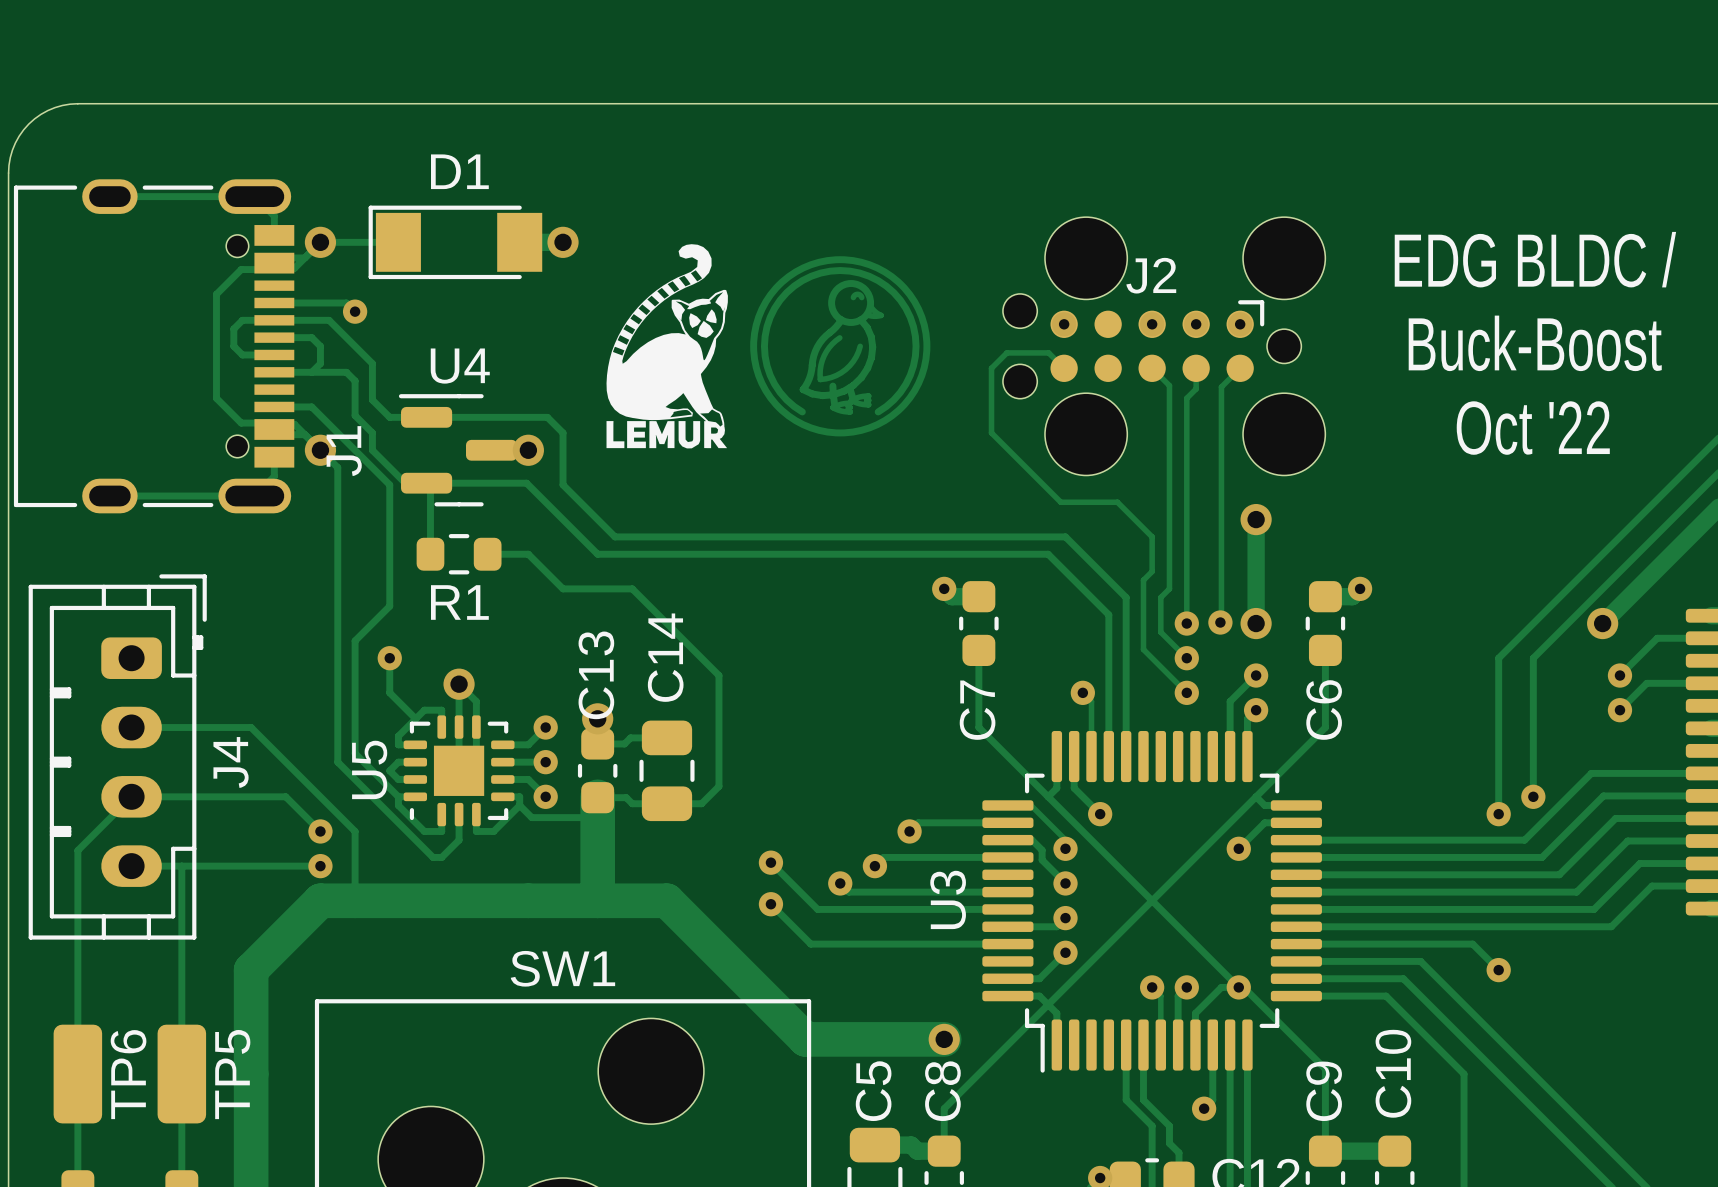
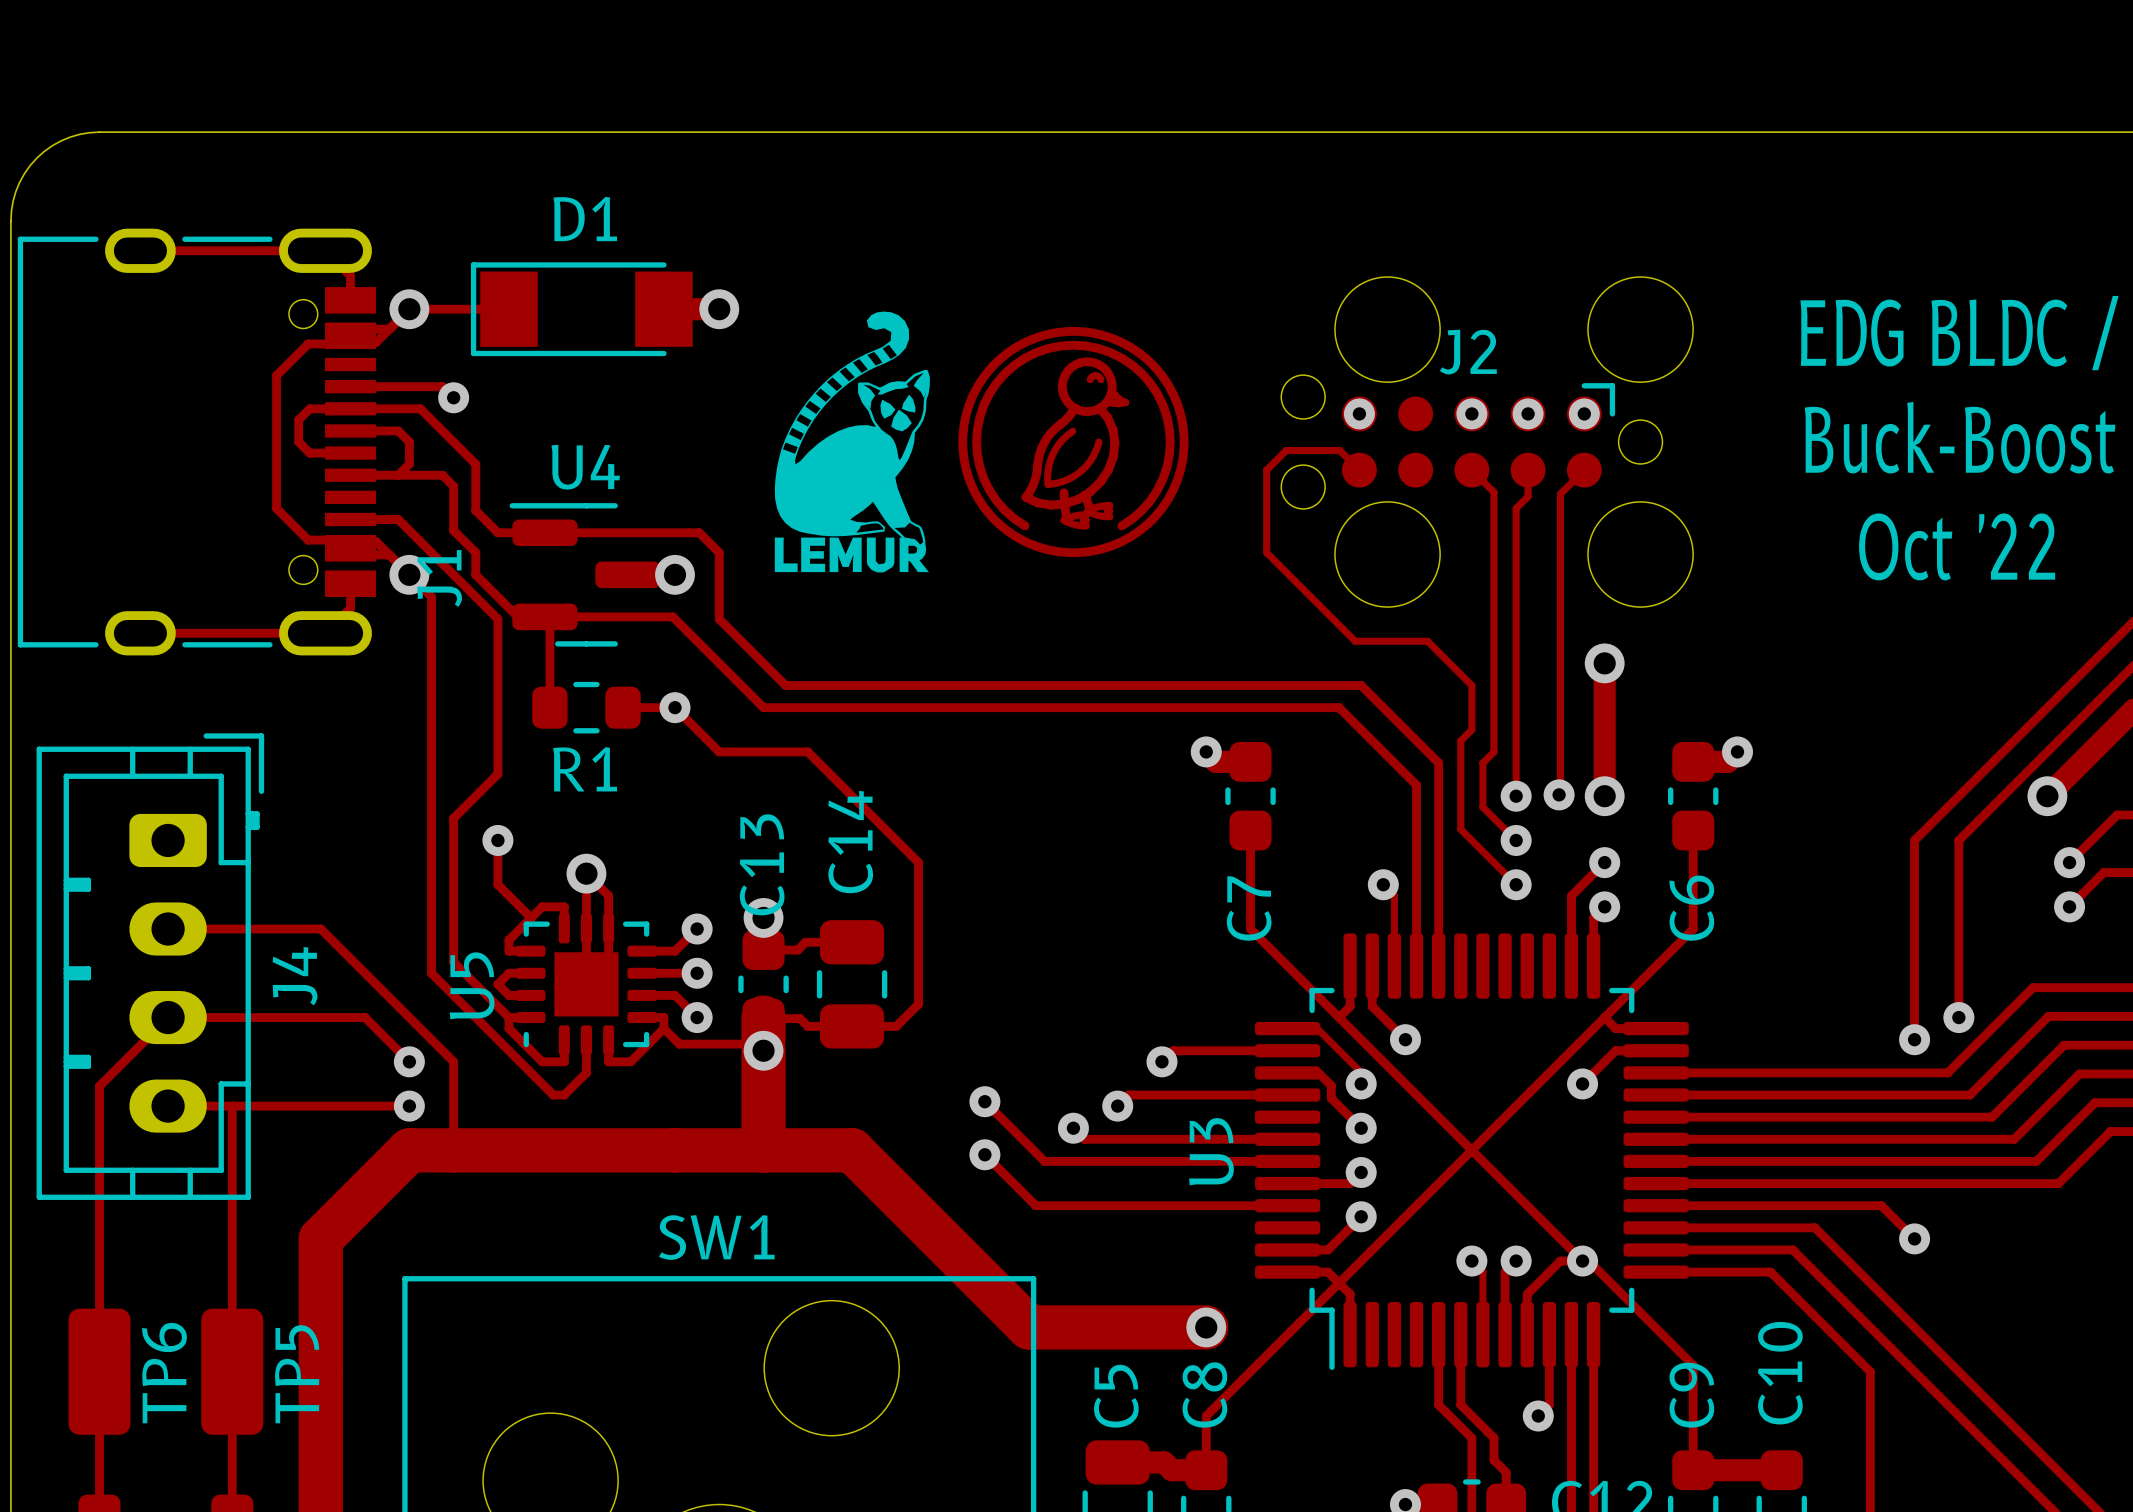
via: none -> (675, 707)
via: none -> (763, 1050)

